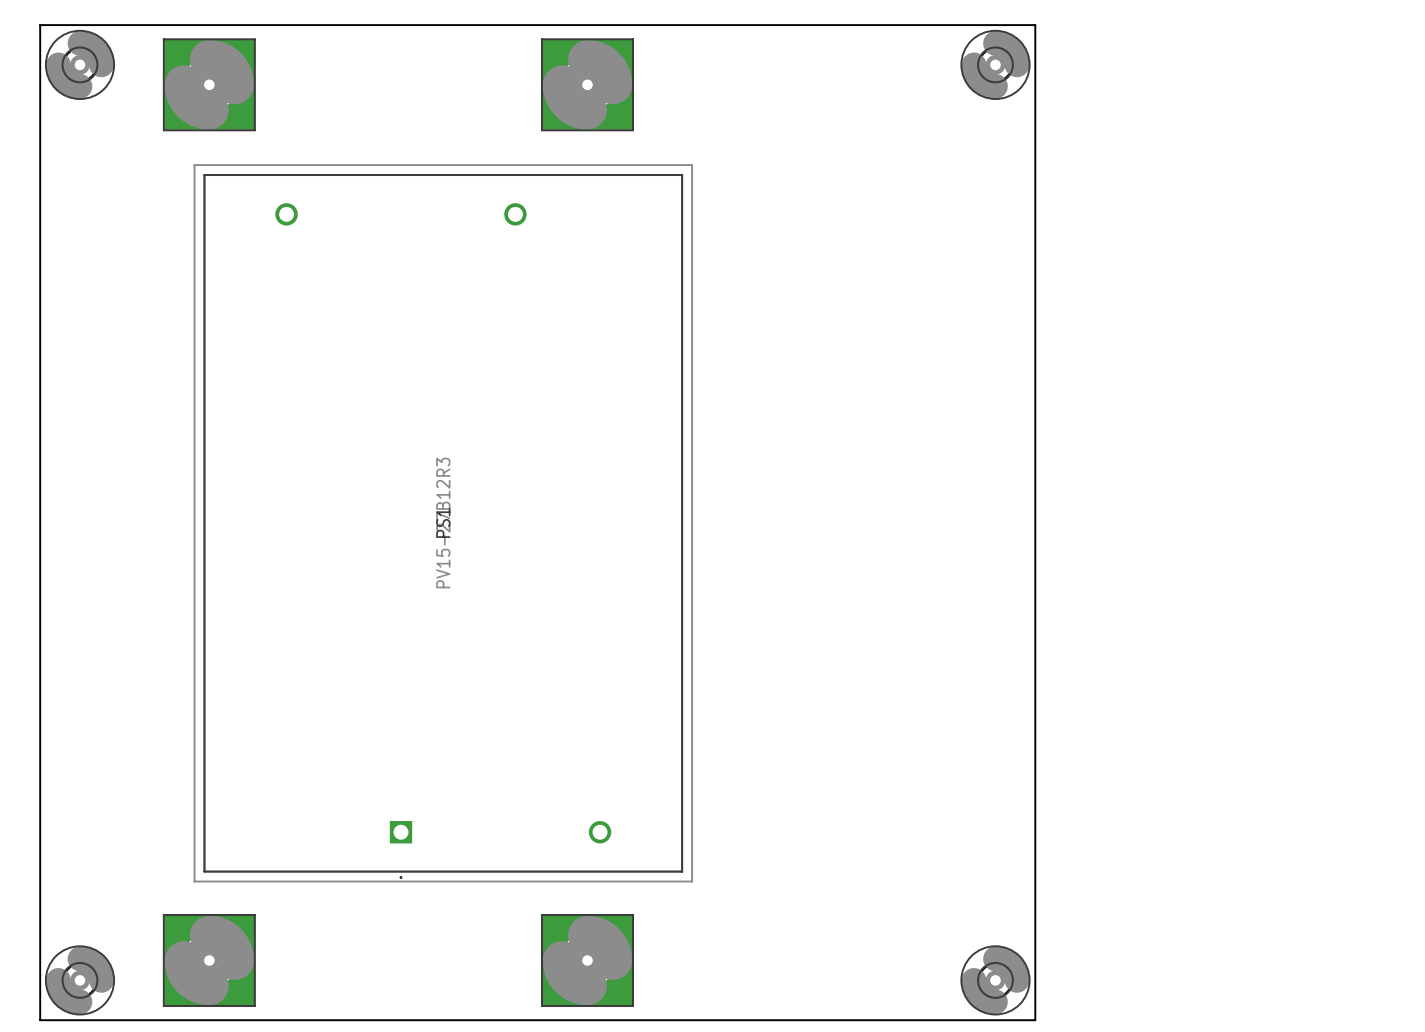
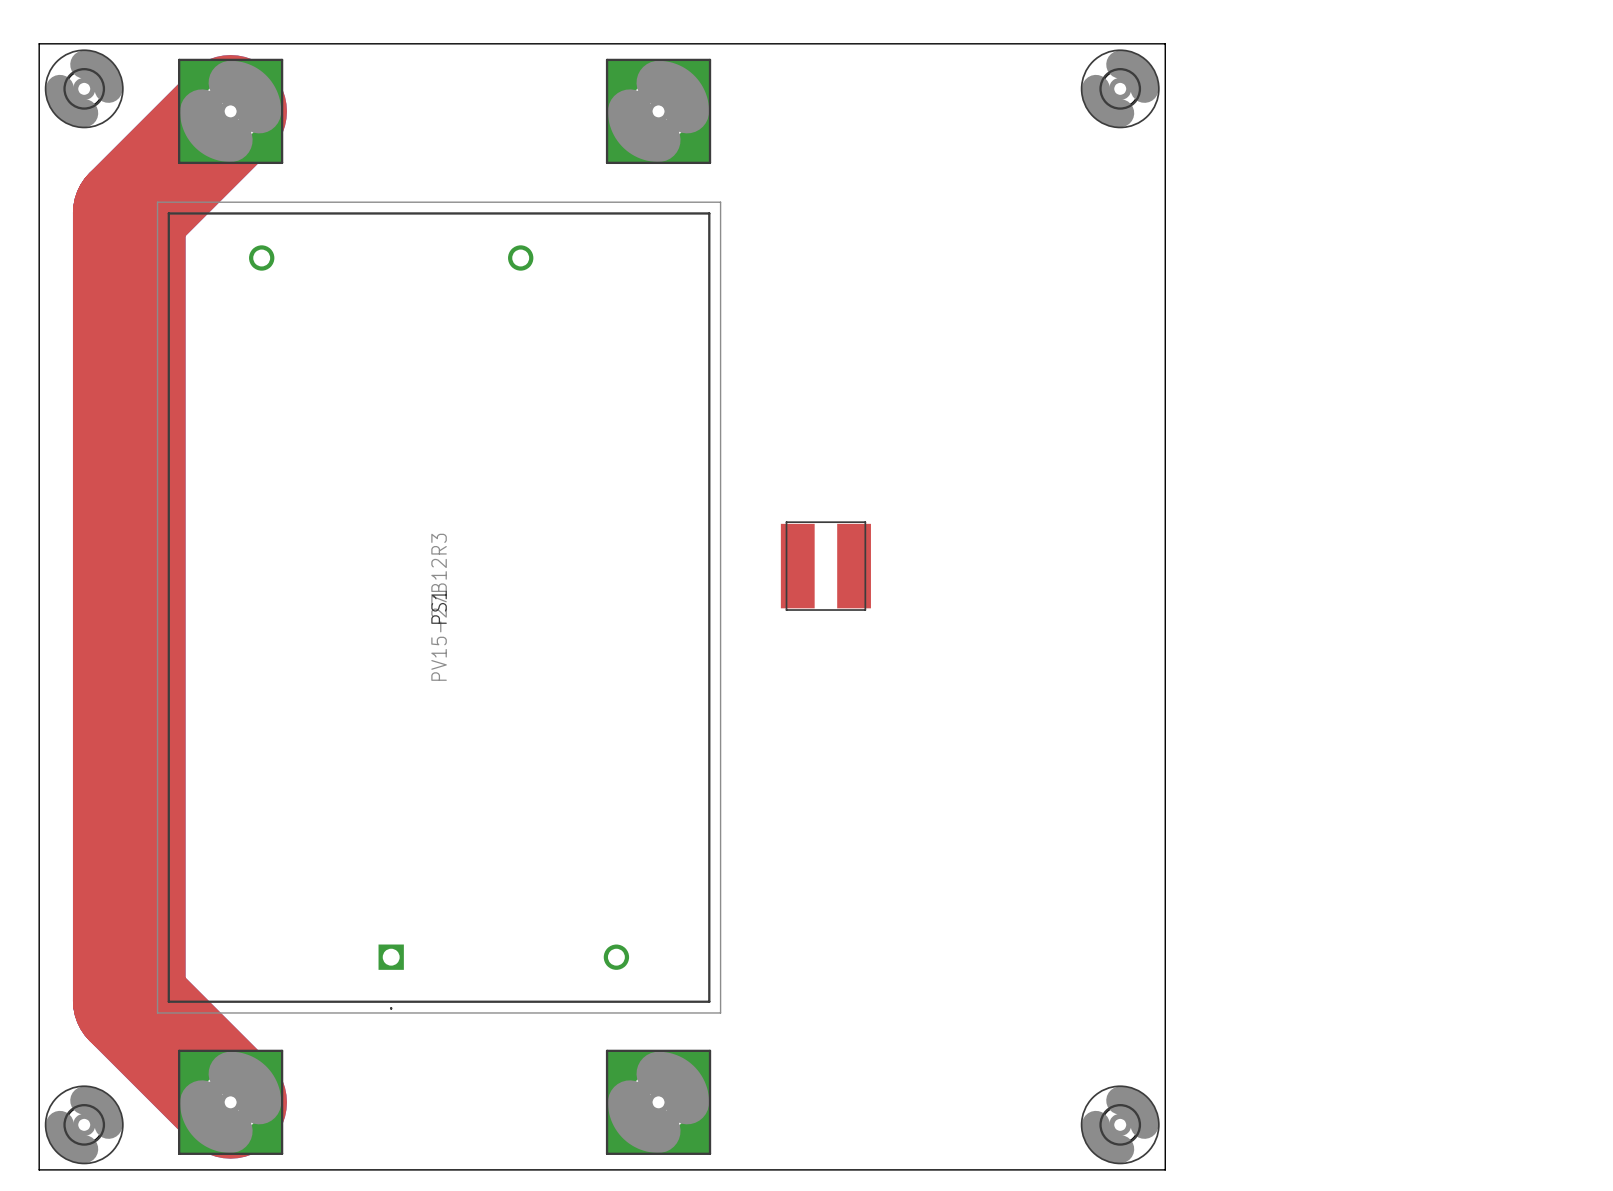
top track: none -> (230, 111) (129, 212) (129, 1000) (230, 1102)
part: none -> (825, 566)
PS1 position: (443, 523) -> (439, 607)

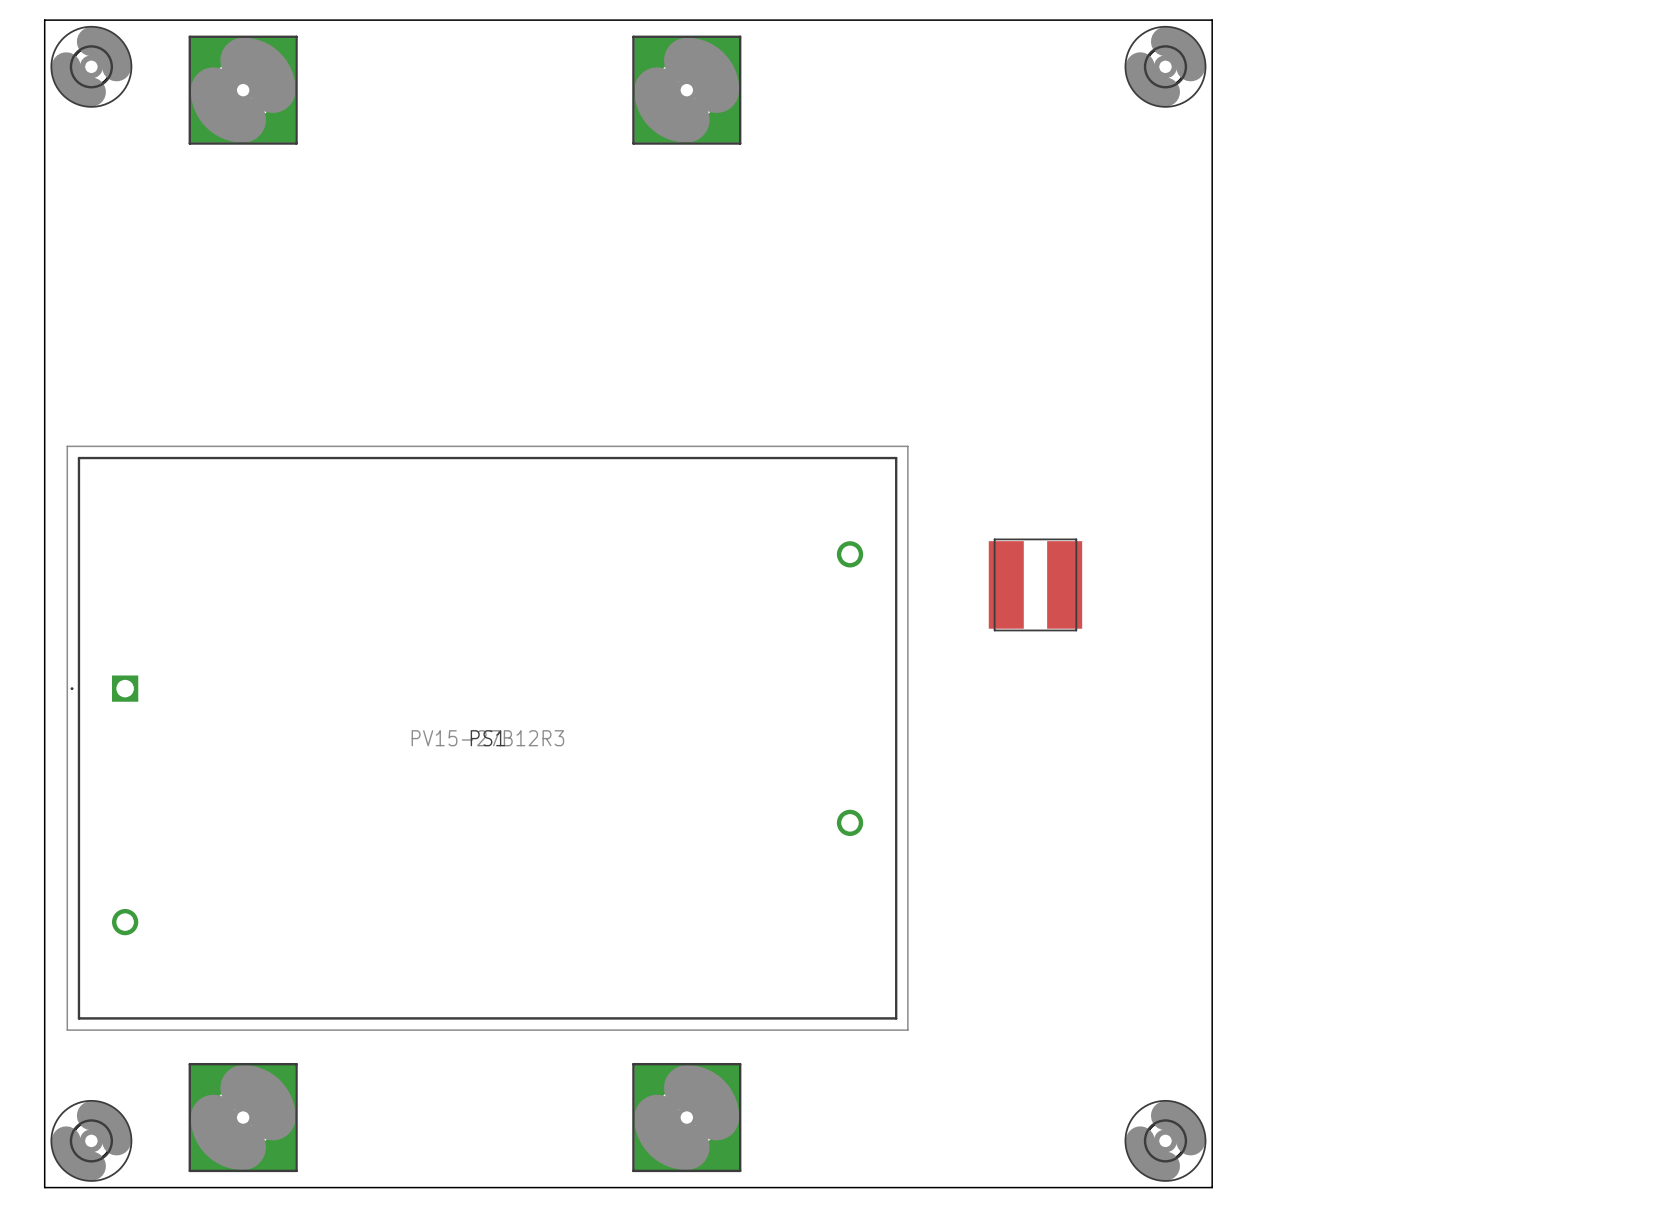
top track: (230, 111) (129, 212) (129, 1000) (230, 1102) -> none
part position: (825, 566) -> (1035, 584)
PS1 rotation: 0° (439, 607) -> 90° clockwise (487, 738)

